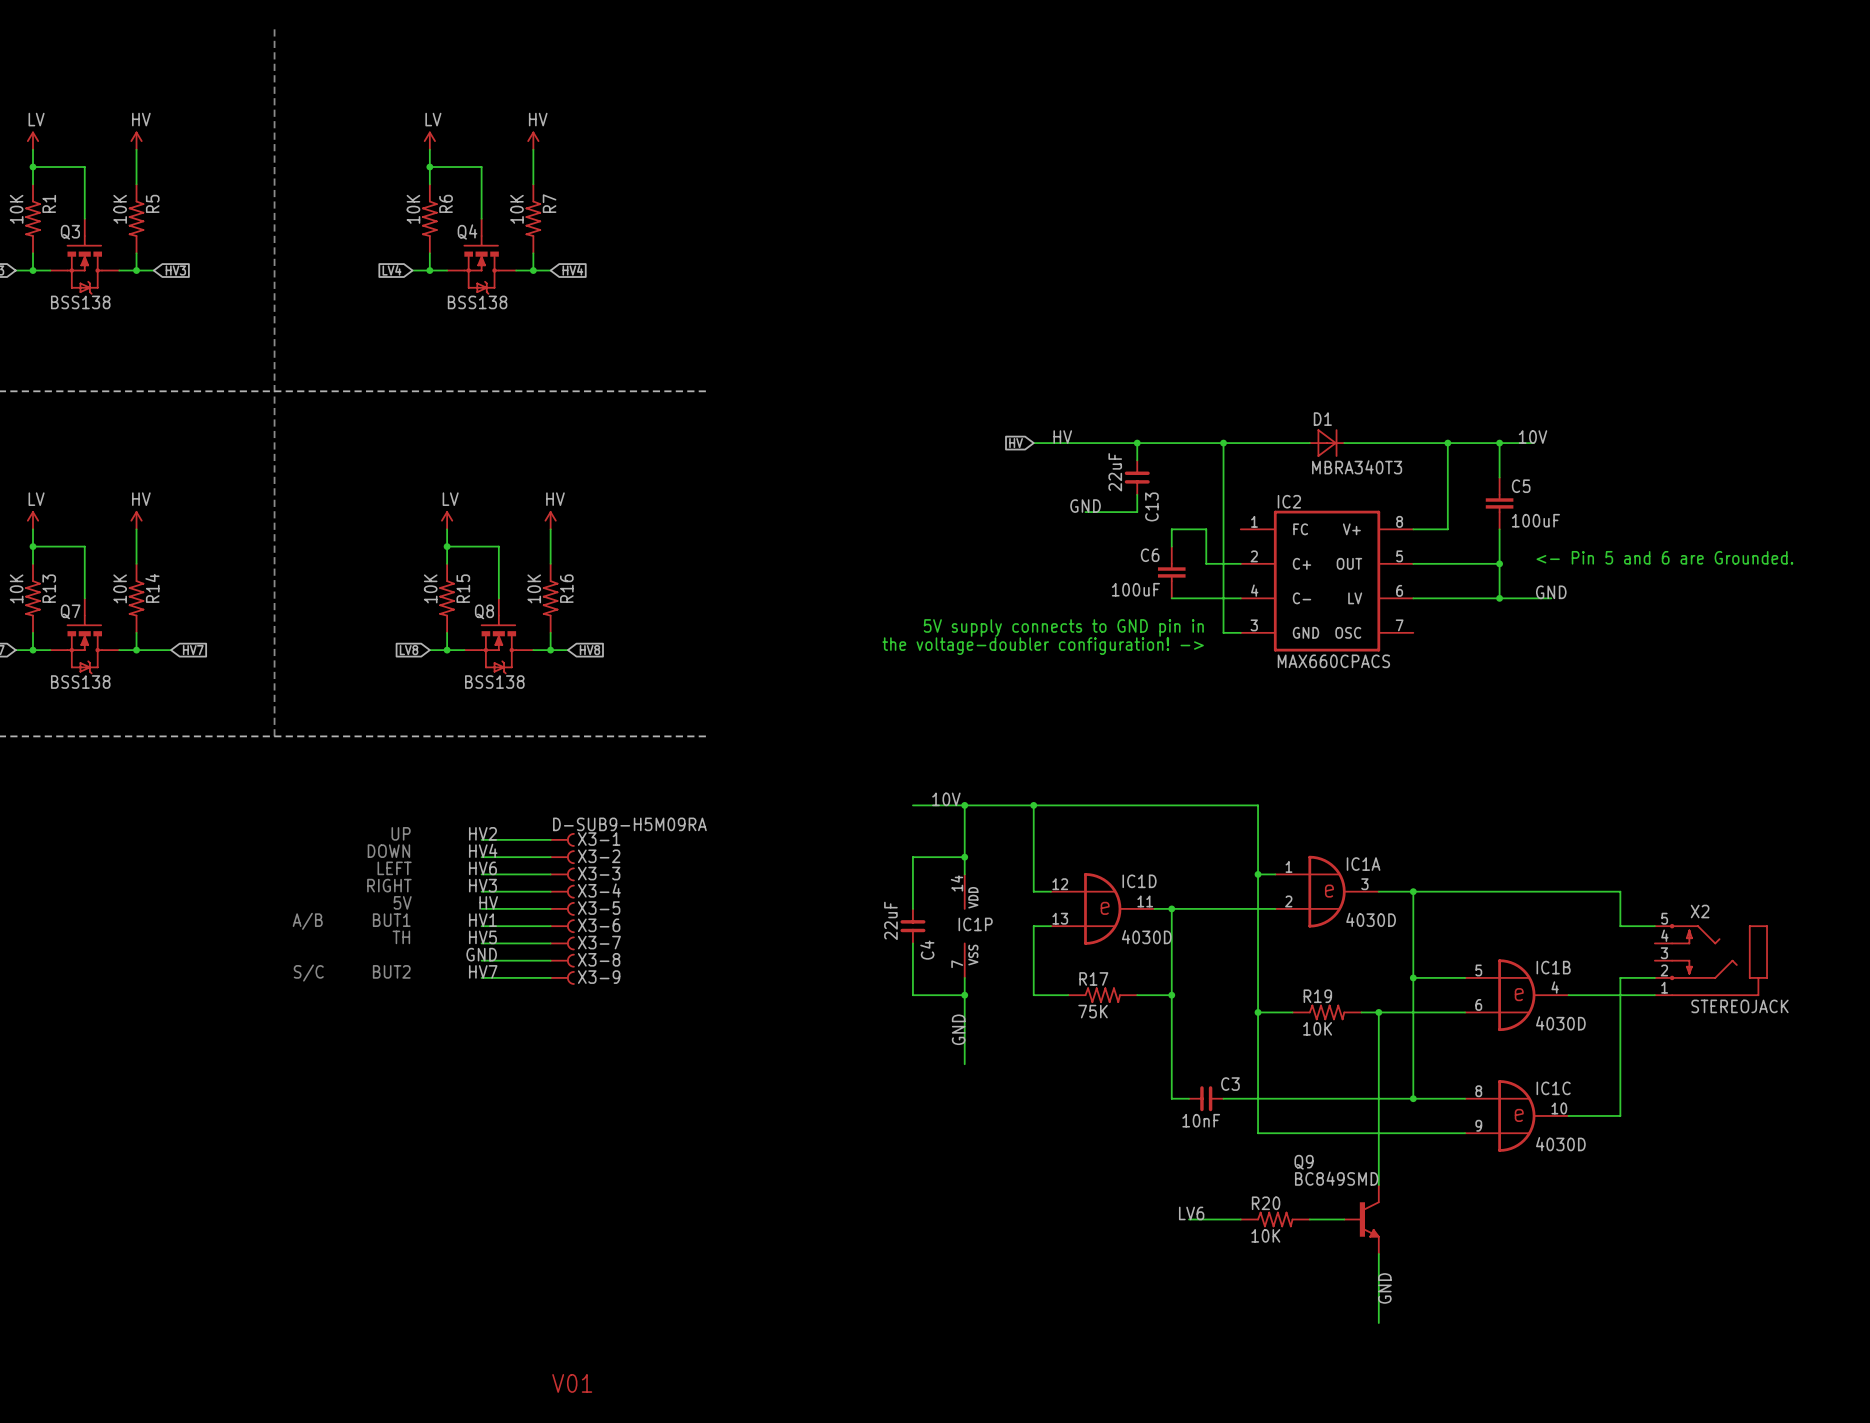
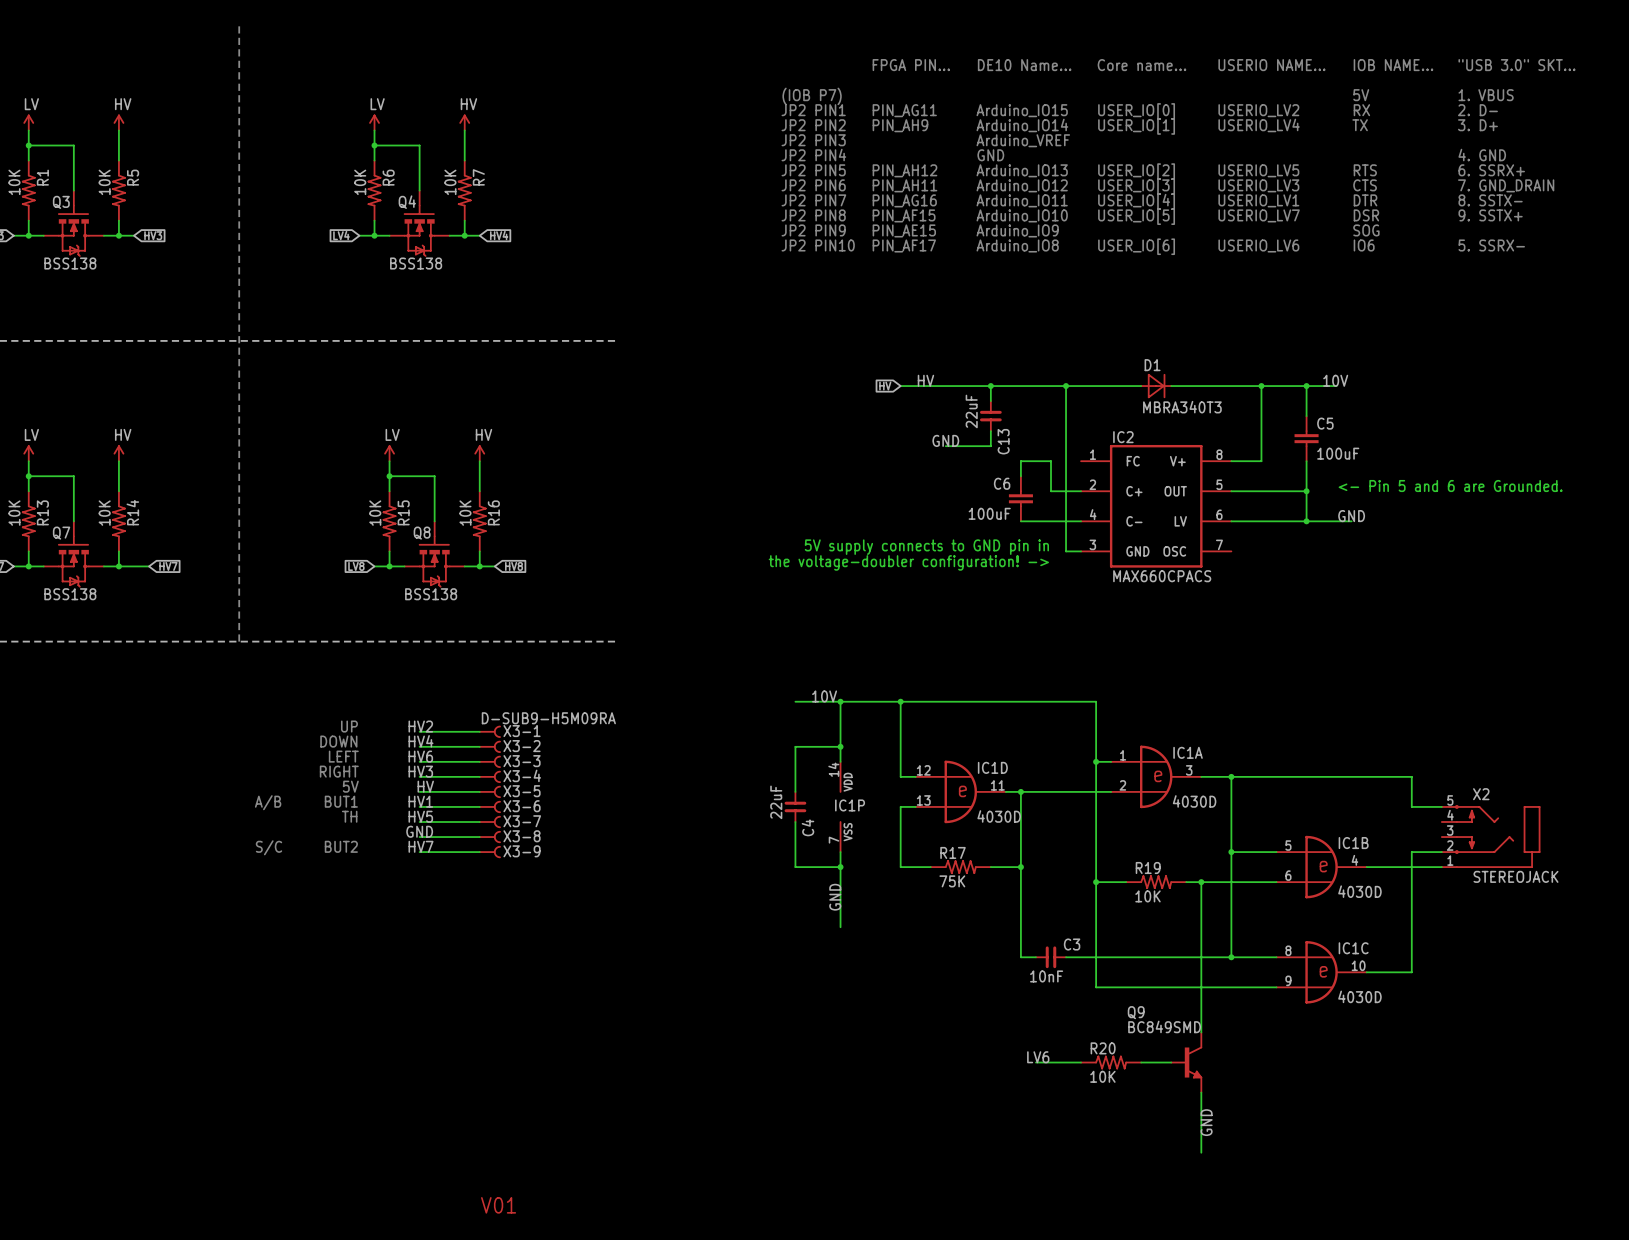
text: none -> FPGA PIN... (911, 65)
text: none -> DE10 Name... (1024, 65)
text: none -> Core name... (1141, 65)
text: none -> USERIO NAME... (1271, 65)
text: none -> IOB NAME... (1393, 65)
text: none -> "USB 3.0" SKT... (1516, 65)
text: none -> 5V (1361, 95)
text: none -> 1. VBUS (1486, 95)
text: none -> (IOB P7) (812, 96)
text: none -> JP2 PIN1 (813, 110)
text: none -> RX (1361, 110)
text: none -> 2. D- (1477, 110)
text: none -> PIN_AG11 (904, 110)
text: none -> Arduino_IO15 (1022, 110)
text: none -> USER_IO[0] (1136, 111)
text: none -> USERIO_LV2 (1258, 110)
text: none -> JP2 PIN2 (813, 125)
text: none -> TX (1360, 125)
text: none -> 3. D+ (1477, 125)
text: none -> PIN_AH9 (900, 125)
text: none -> Arduino_IO14 (1022, 125)
text: none -> USERIO_LV4 (1259, 125)
text: none -> USER_IO[1] (1136, 126)
text: none -> JP2 PIN3 (813, 140)
text: none -> Arduino_VREF (1023, 140)
text: none -> JP2 PIN4 (813, 155)
text: none -> 4. GND (1482, 155)
text: none -> GND (990, 155)
text: none -> JP2 PIN5 (813, 170)
text: none -> RTS (1365, 170)
text: none -> 6. SSRX+ (1491, 170)
text: none -> PIN_AH12 (904, 170)
text: none -> Arduino_IO13 (1022, 170)
text: none -> USER_IO[2] (1136, 171)
text: none -> USERIO_LV5 (1258, 170)
text: none -> JP2 PIN6 (813, 185)
text: none -> CTS (1365, 185)
text: none -> PIN_AH11 (904, 185)
text: none -> Arduino_IO12 (1022, 185)
text: none -> USERIO_LV3 (1258, 185)
text: none -> 7. GND_DRAIN (1506, 185)
text: none -> USER_IO[3] (1136, 186)
text: none -> JP2 PIN7 (813, 200)
text: none -> DTR (1365, 200)
text: none -> 8. SSTX- (1490, 200)
text: none -> PIN_AG16 (904, 200)
text: none -> Arduino_IO11 (1022, 200)
text: none -> USERIO_LV1 (1258, 200)
text: none -> USER_IO[4] (1136, 201)
text: none -> JP2 PIN8 (813, 215)
text: none -> PIN_AF15 (904, 215)
text: none -> Arduino_IO10 (1022, 215)
text: none -> USERIO_LV7 (1259, 215)
text: none -> DSR (1366, 215)
text: none -> 9. SSTX+ (1490, 215)
text: none -> USER_IO[5] (1136, 216)
text: none -> JP2 PIN9 (813, 230)
text: none -> SOG (1366, 230)
text: none -> PIN_AE15 (904, 230)
text: none -> Arduino_IO9 (1017, 230)
text: none -> JP2 PIN10 (818, 245)
text: none -> IO6 (1364, 245)
text: none -> 5. SSRX- (1491, 245)
text: none -> PIN_AF17 (904, 245)
text: none -> Arduino_IO8 (1017, 245)
text: none -> USERIO_LV6 (1258, 245)
text: none -> USER_IO[6] (1136, 246)

